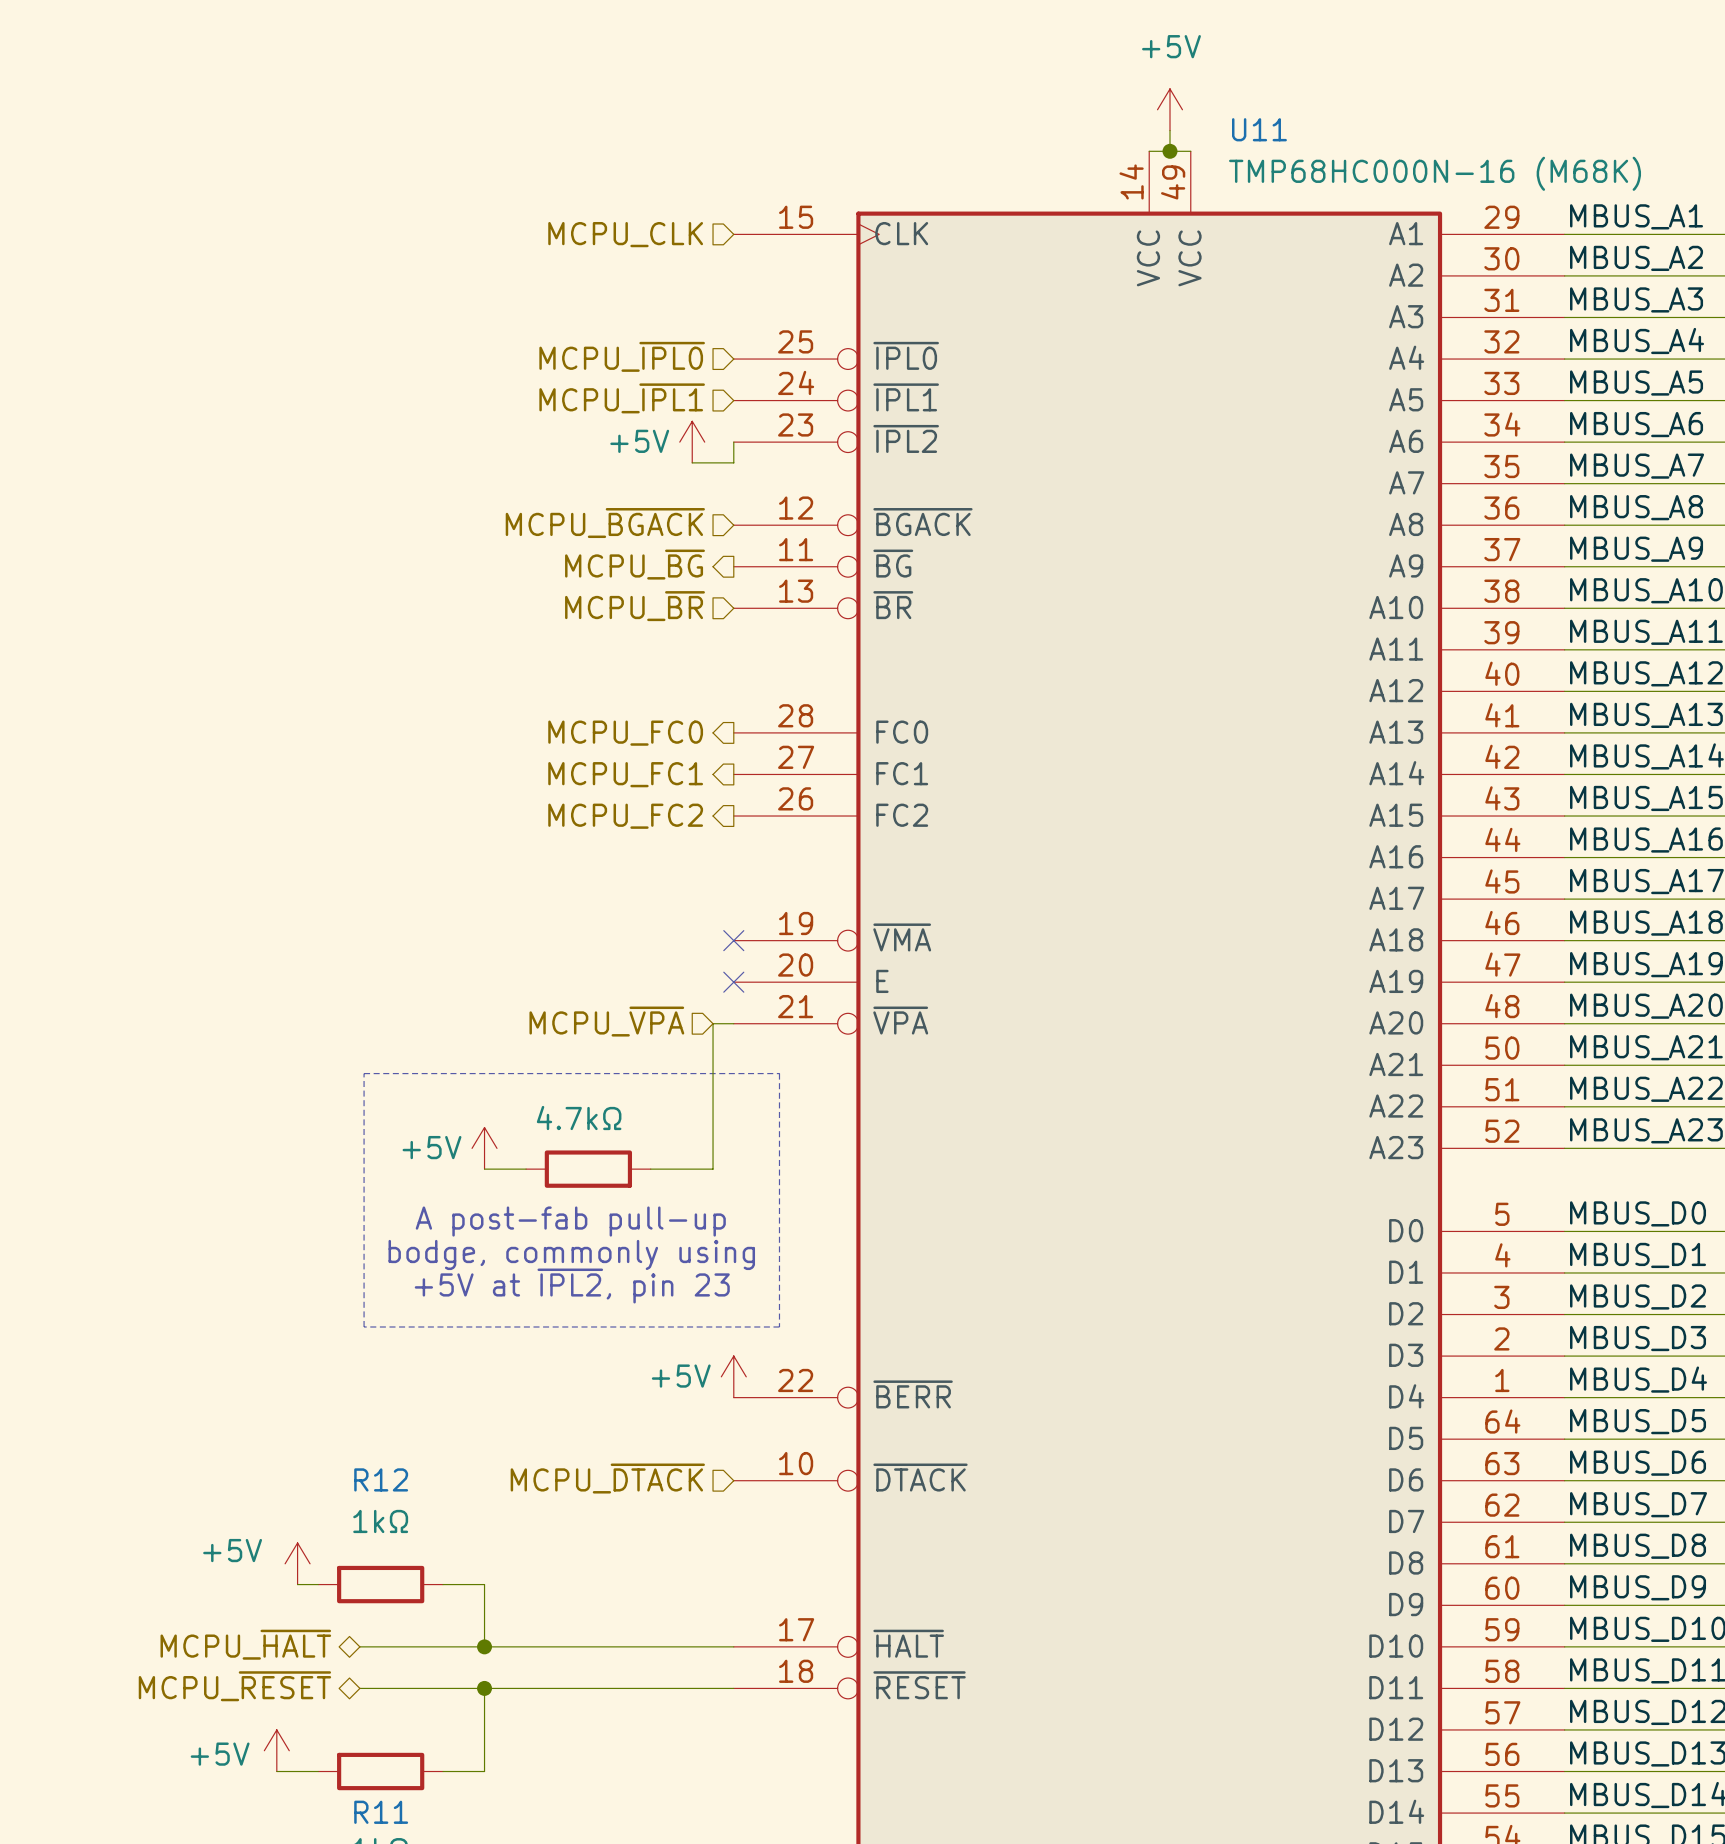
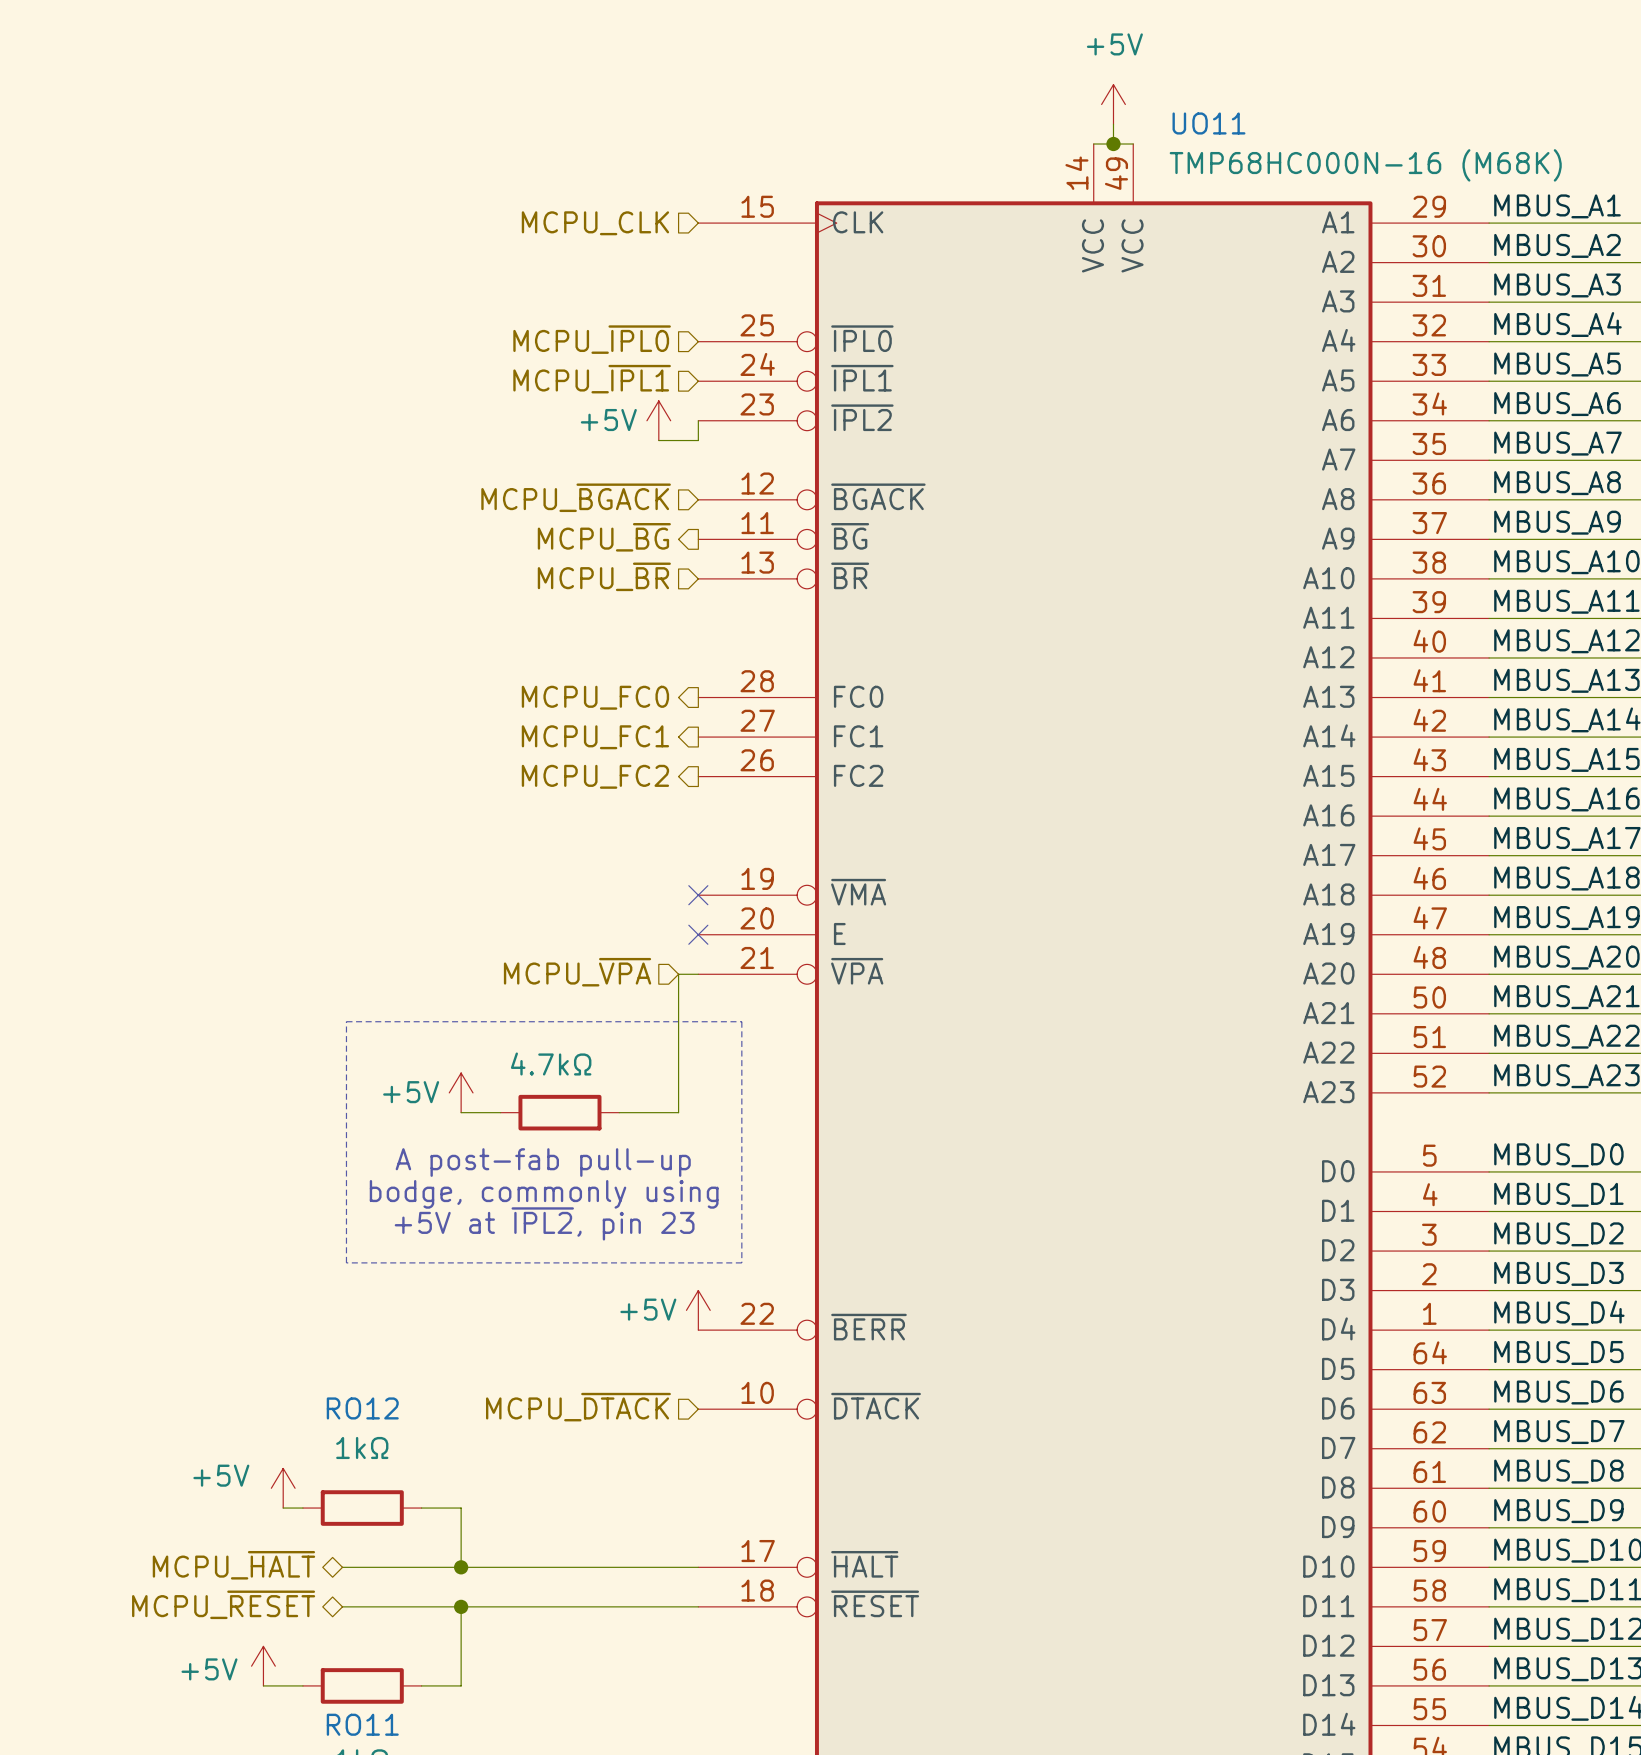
U11 name: U11 (1259, 129) -> UO11 (1208, 123)
R12 name: R12 (381, 1479) -> RO12 (362, 1408)
R11 name: R11 (381, 1812) -> RO11 (362, 1724)

